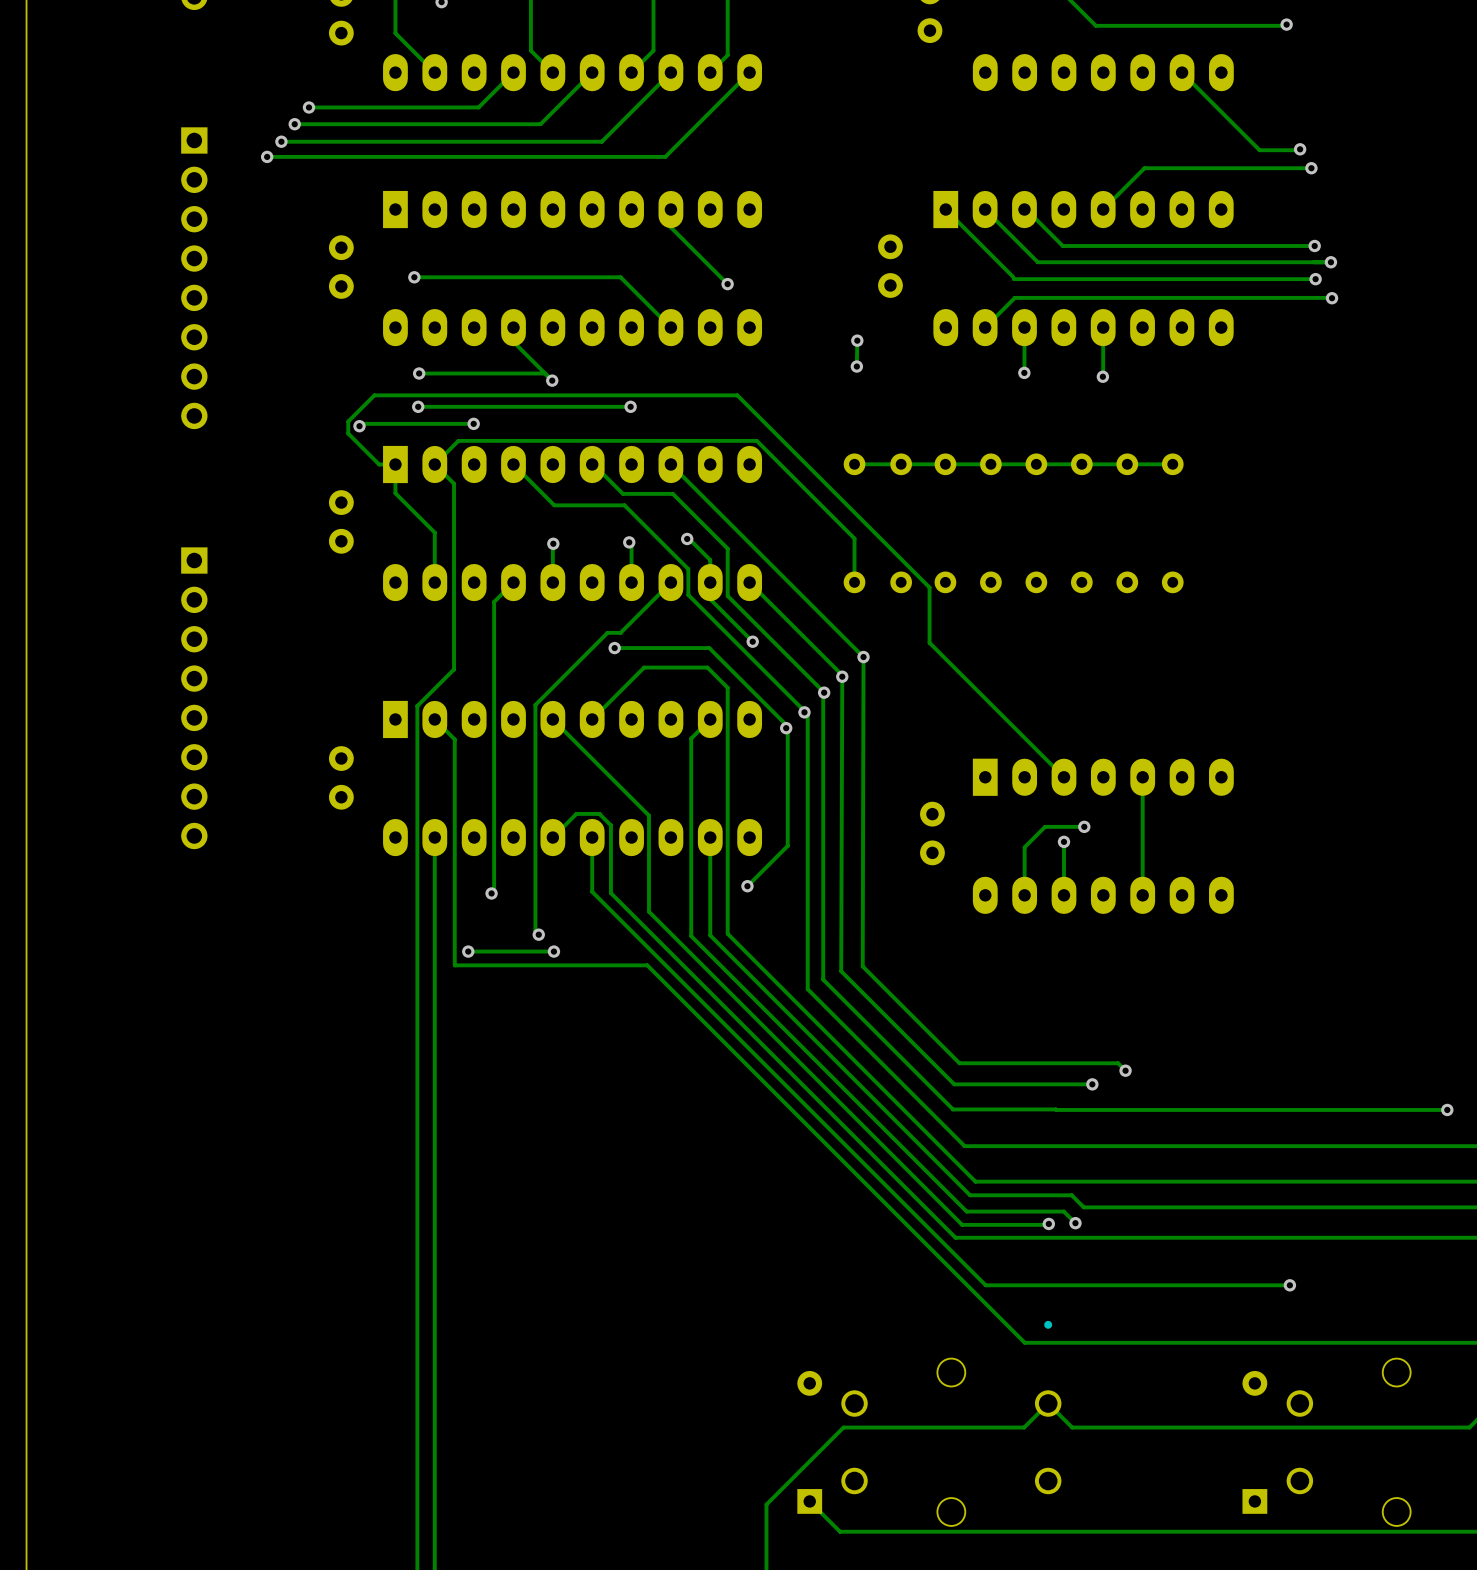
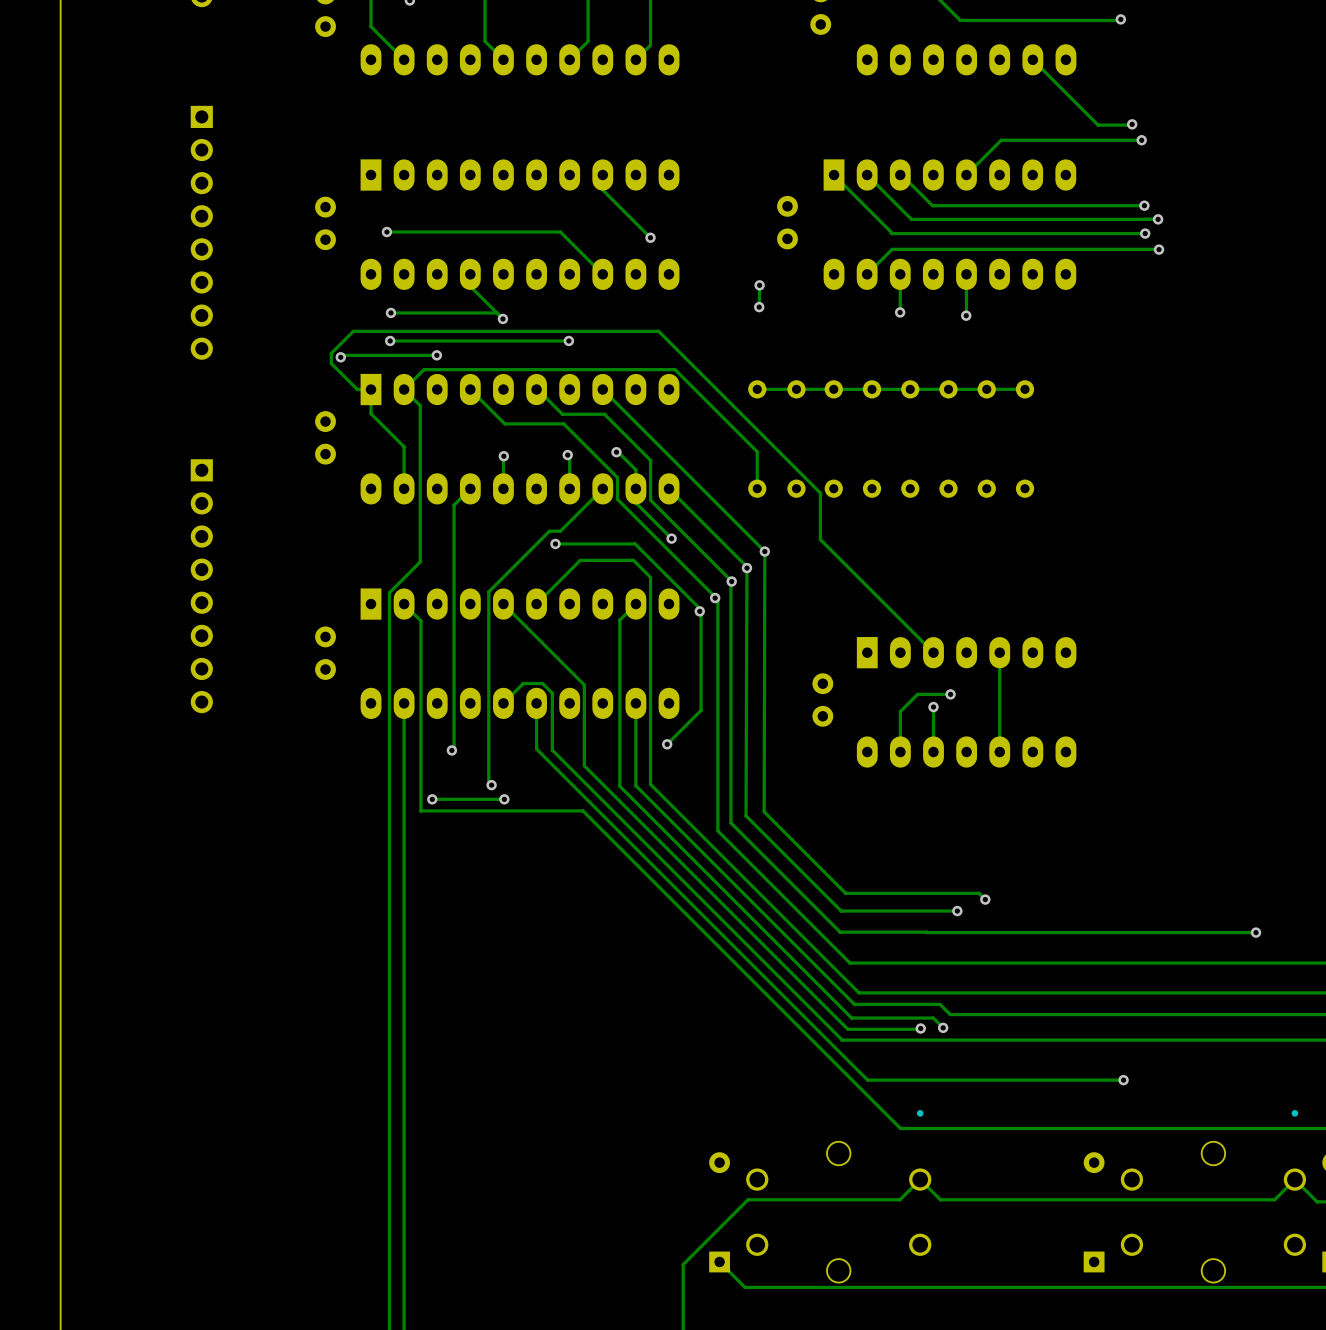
track: (513, 72) (478, 107) (308, 107) -> none
track: (592, 72) (540, 124) (294, 124) -> none
track: (670, 72) (601, 141) (281, 141) -> none
track: (749, 72) (665, 156) (267, 156) -> none
via: (308, 107) -> none
via: (294, 124) -> none
via: (281, 141) -> none
via: (267, 156) -> none

